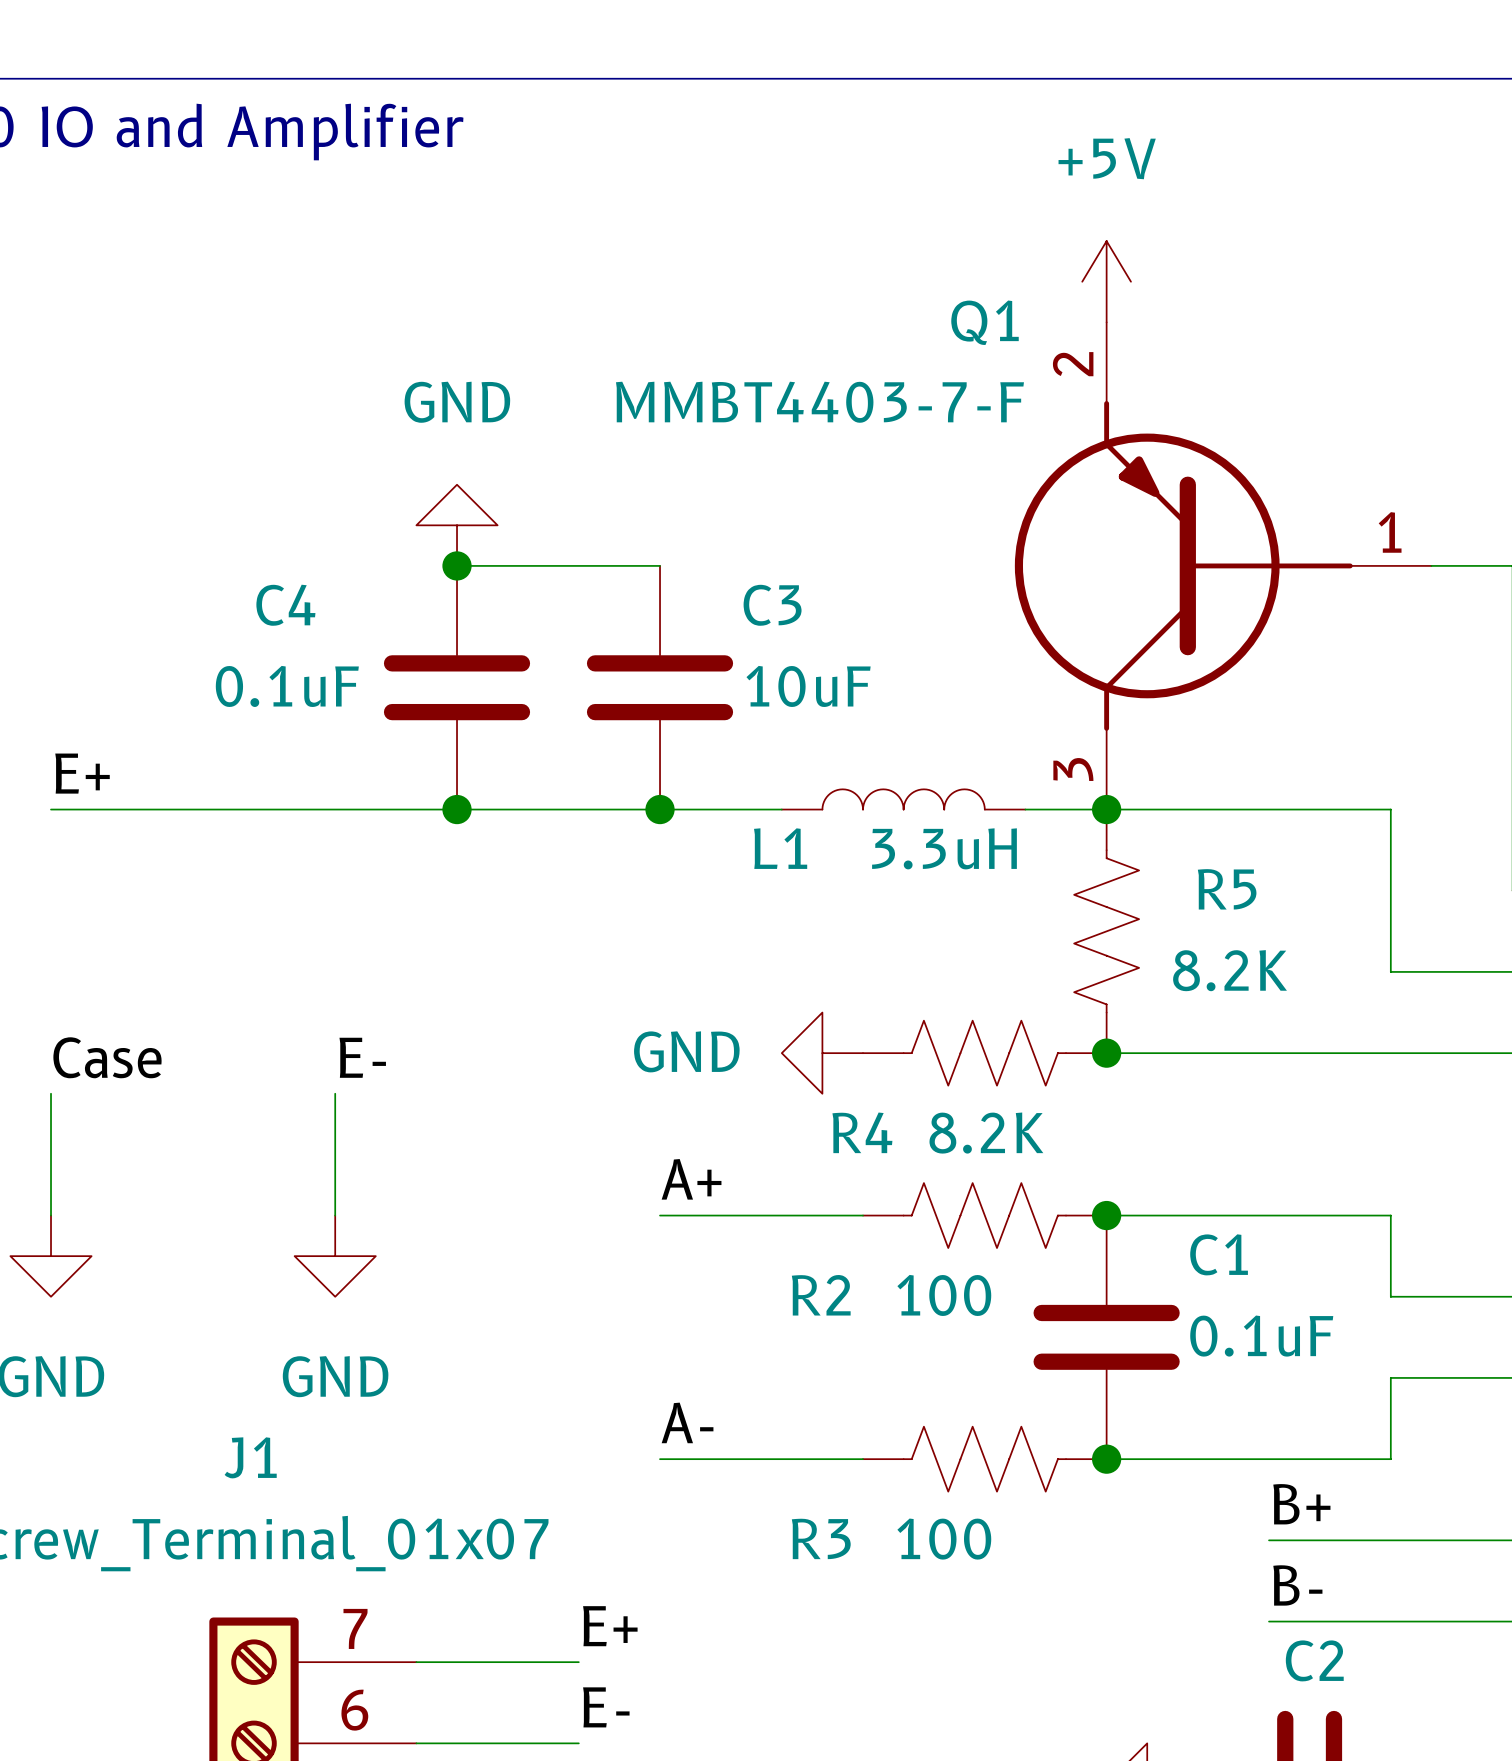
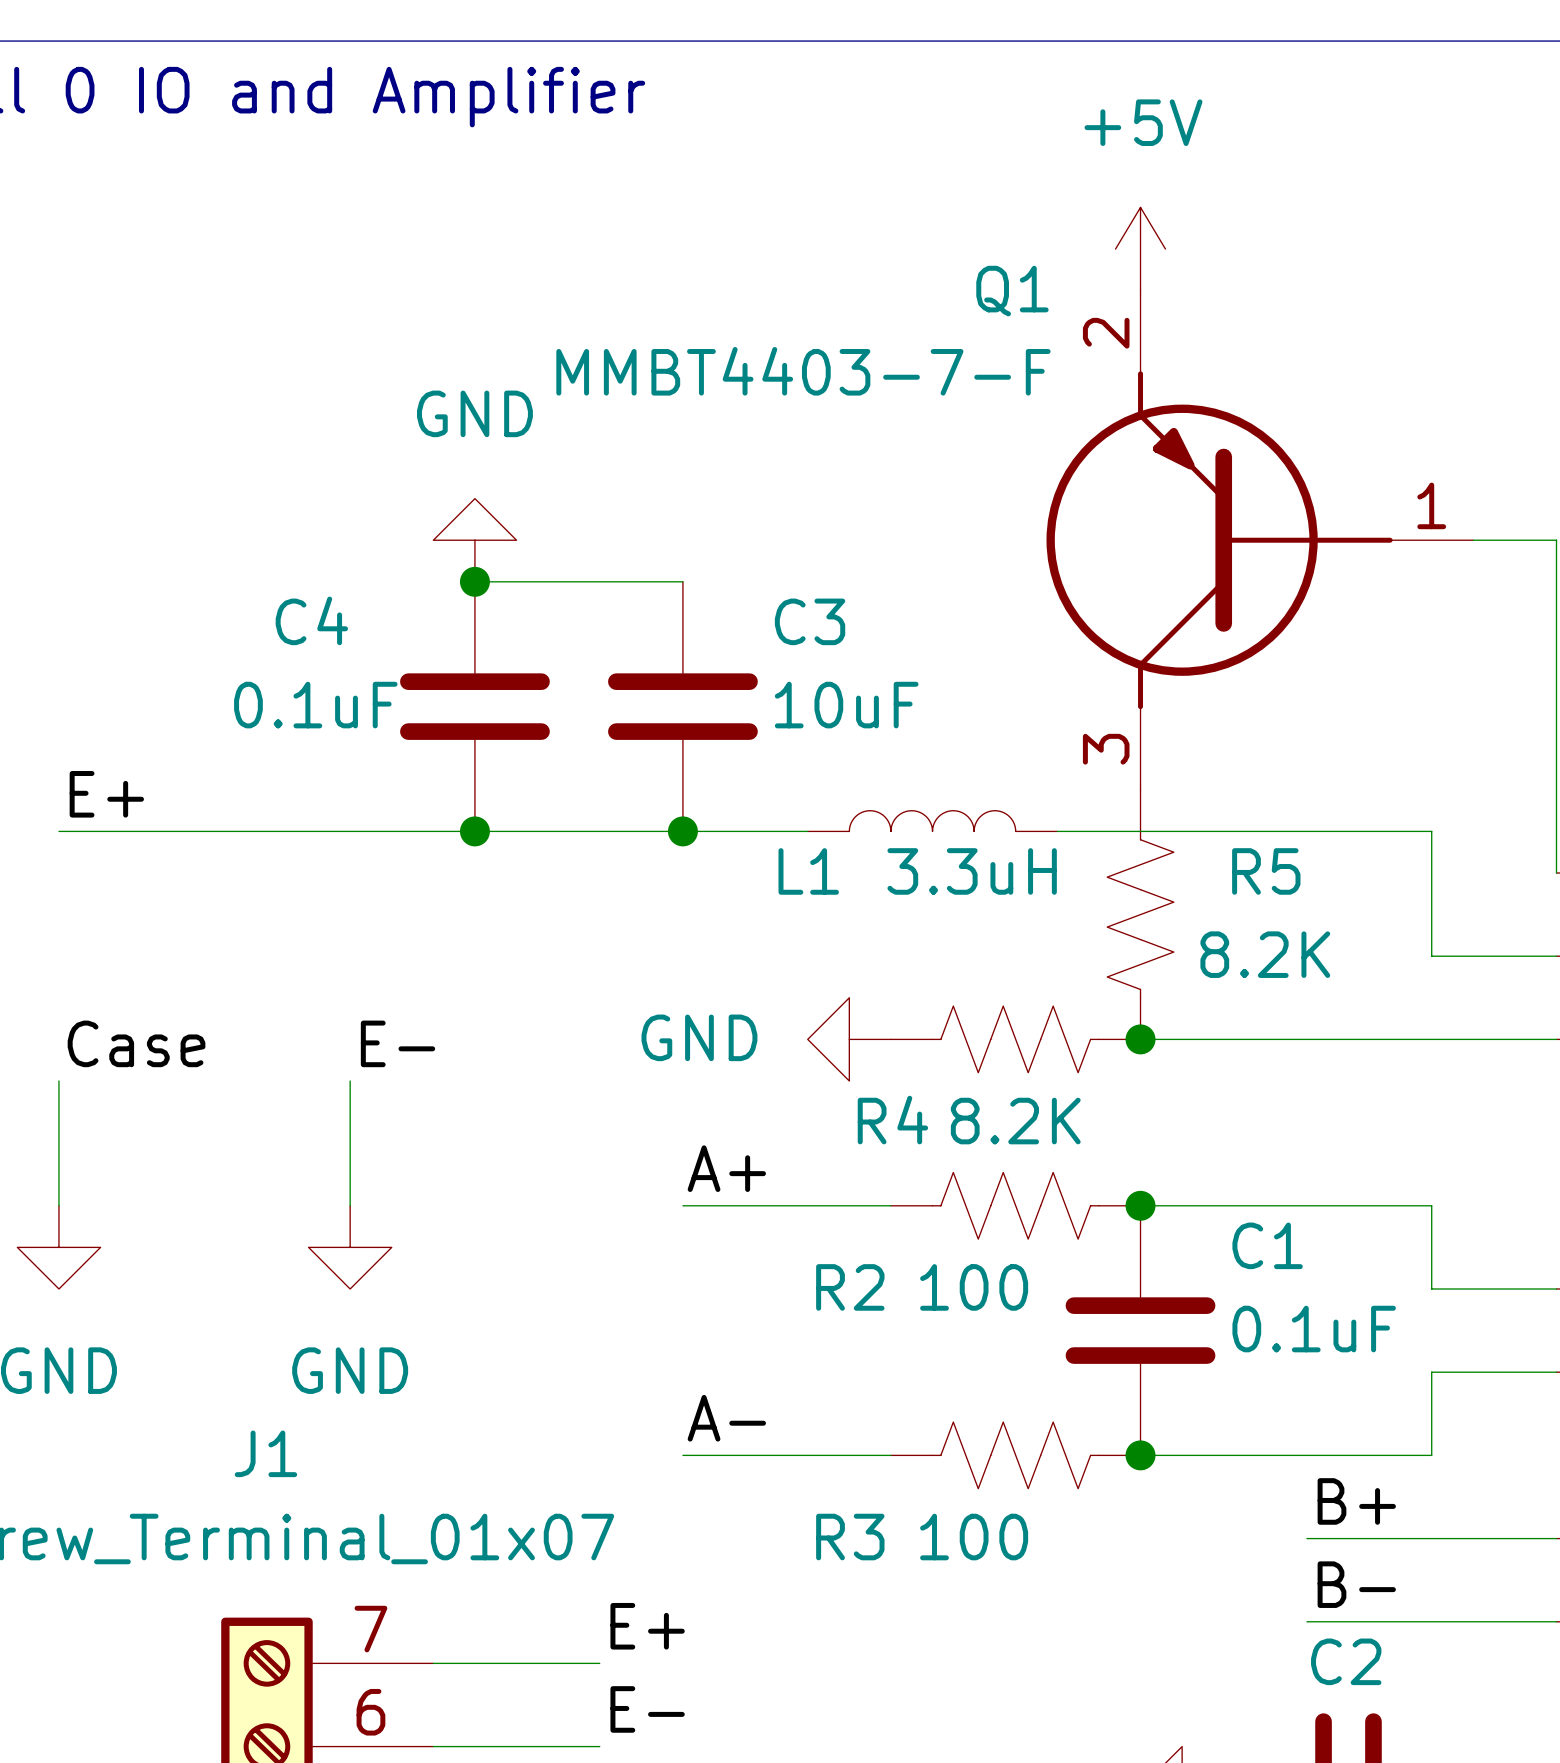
power symbol position: GND (457, 525) -> GND (474, 540)
wire: (457, 565) (660, 565) -> (474, 581) (682, 581)
junction position: (457, 565) -> (474, 581)
C4 position: (457, 687) -> (474, 706)
C3 position: (660, 687) -> (682, 706)
label position: E+ (82, 773) -> E+ (106, 794)
L1 position: (903, 799) -> (932, 821)
wire: (51, 809) (781, 809) -> (58, 831) (807, 831)
junction position: (457, 809) -> (474, 831)
junction position: (660, 809) -> (682, 831)
wire: (1025, 809) (1390, 809) (1390, 850) -> (1057, 831) (1431, 831)
junction: (1106, 809) -> none

